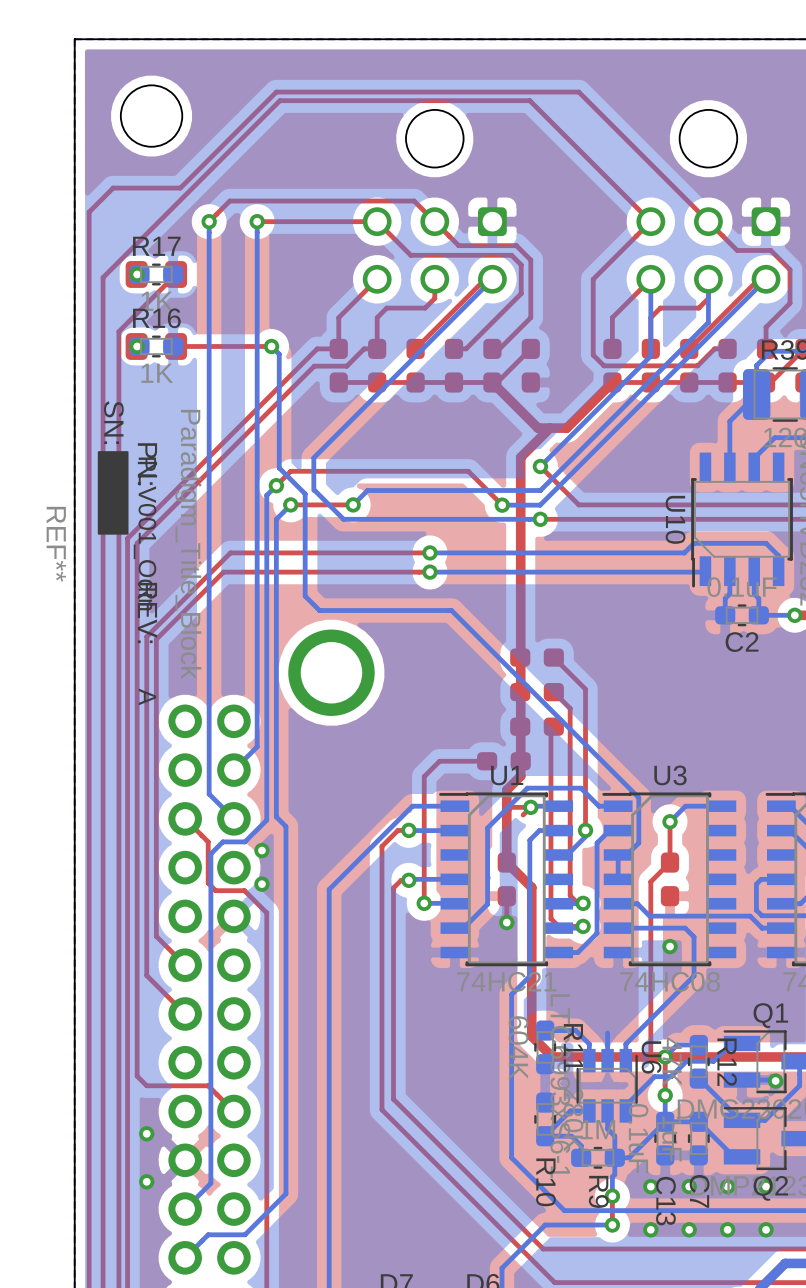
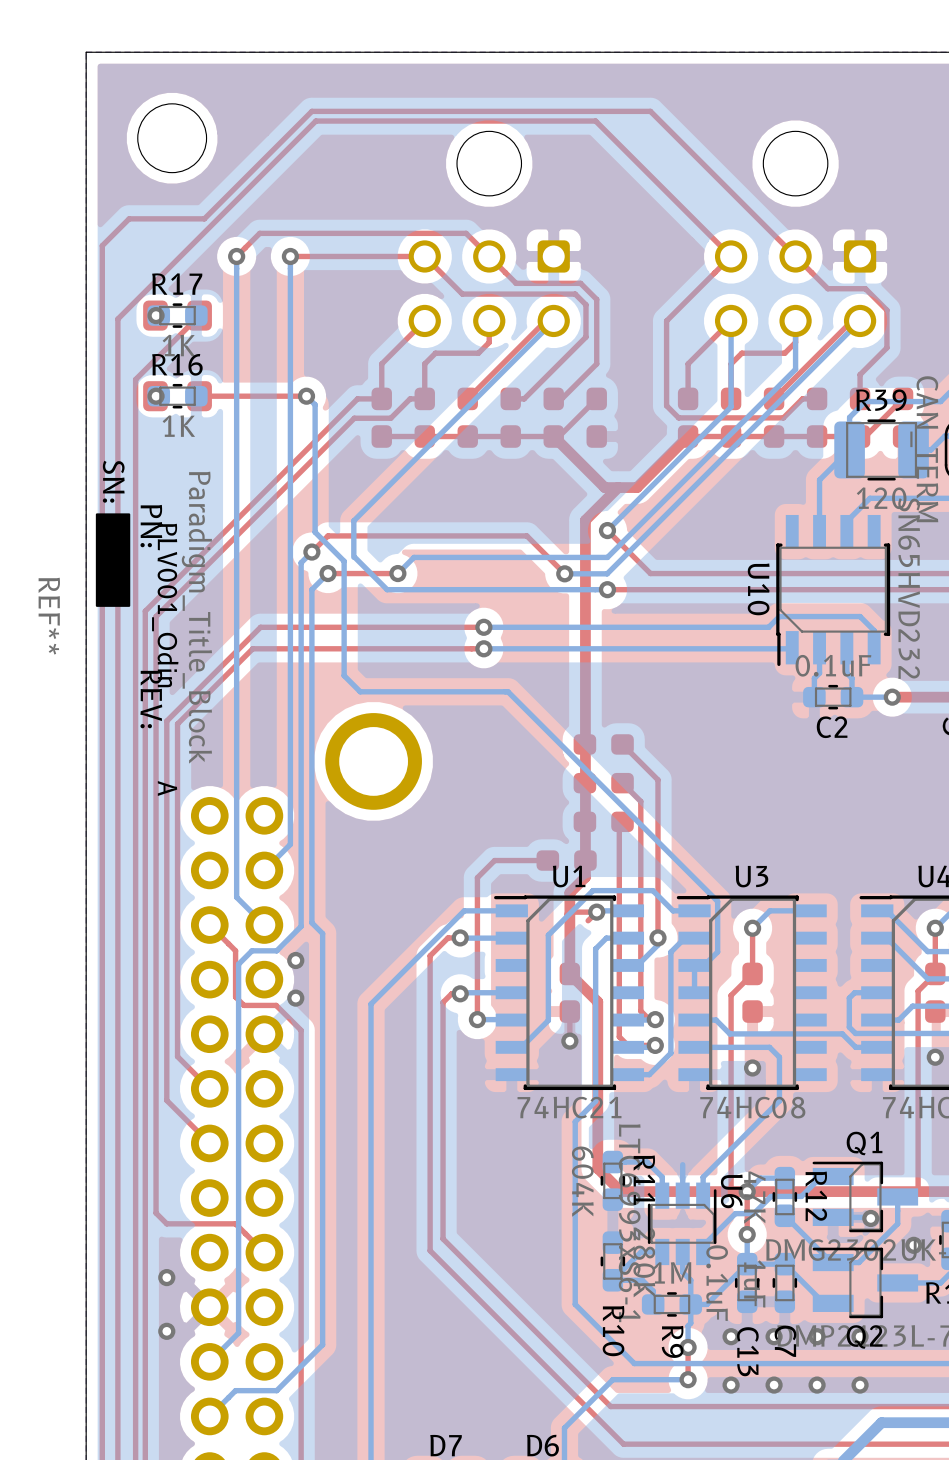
REF** position: (113, 492) -> (113, 560)

